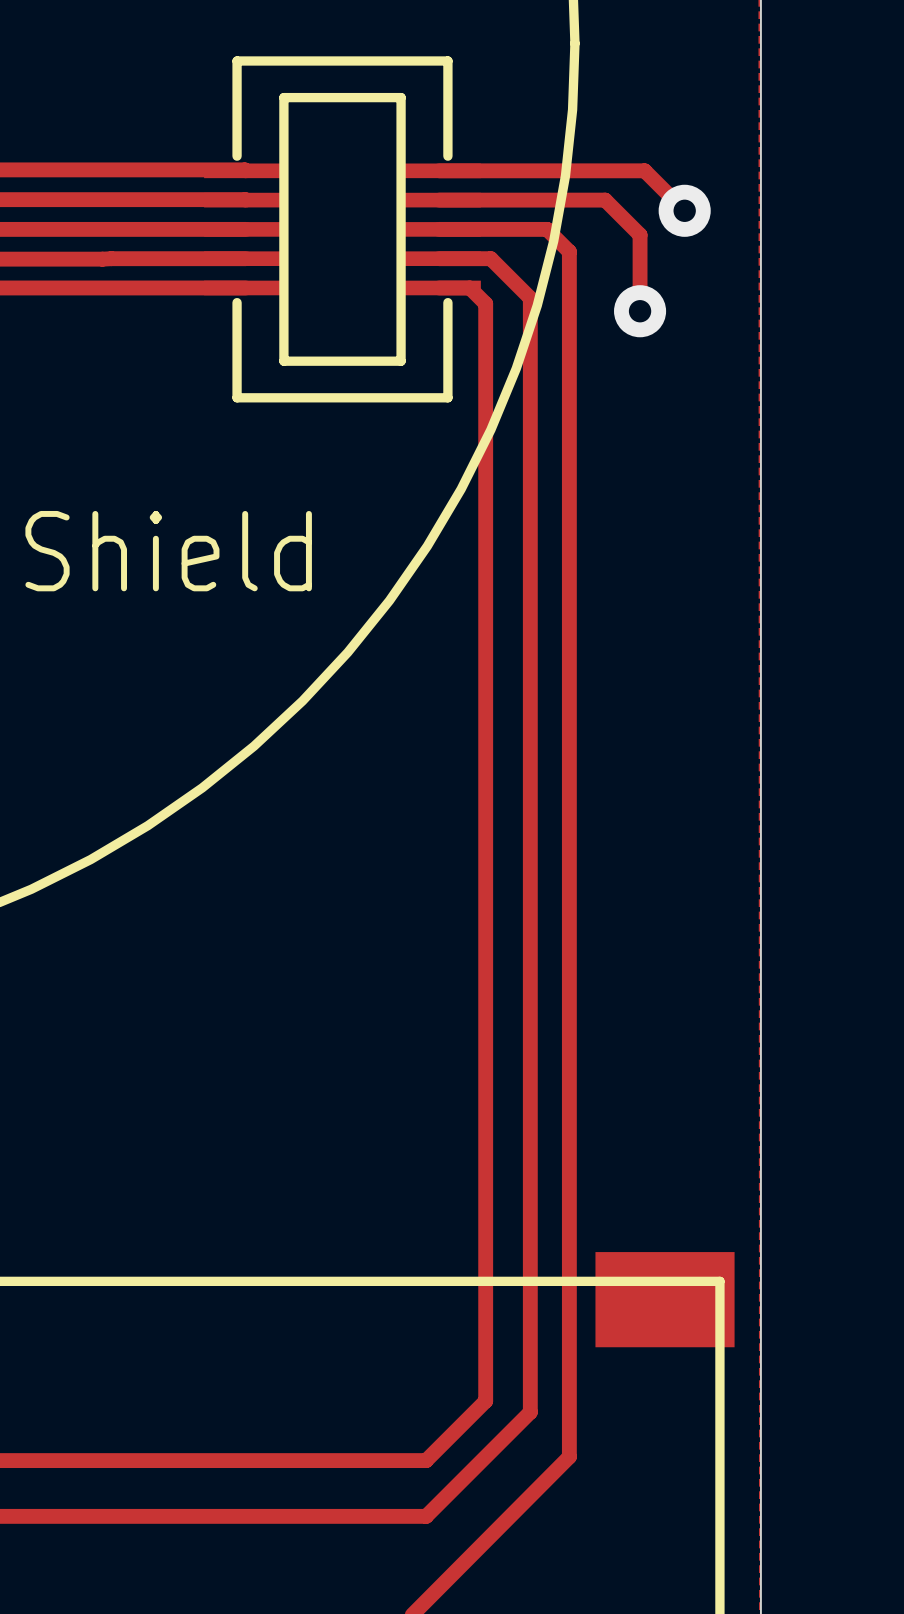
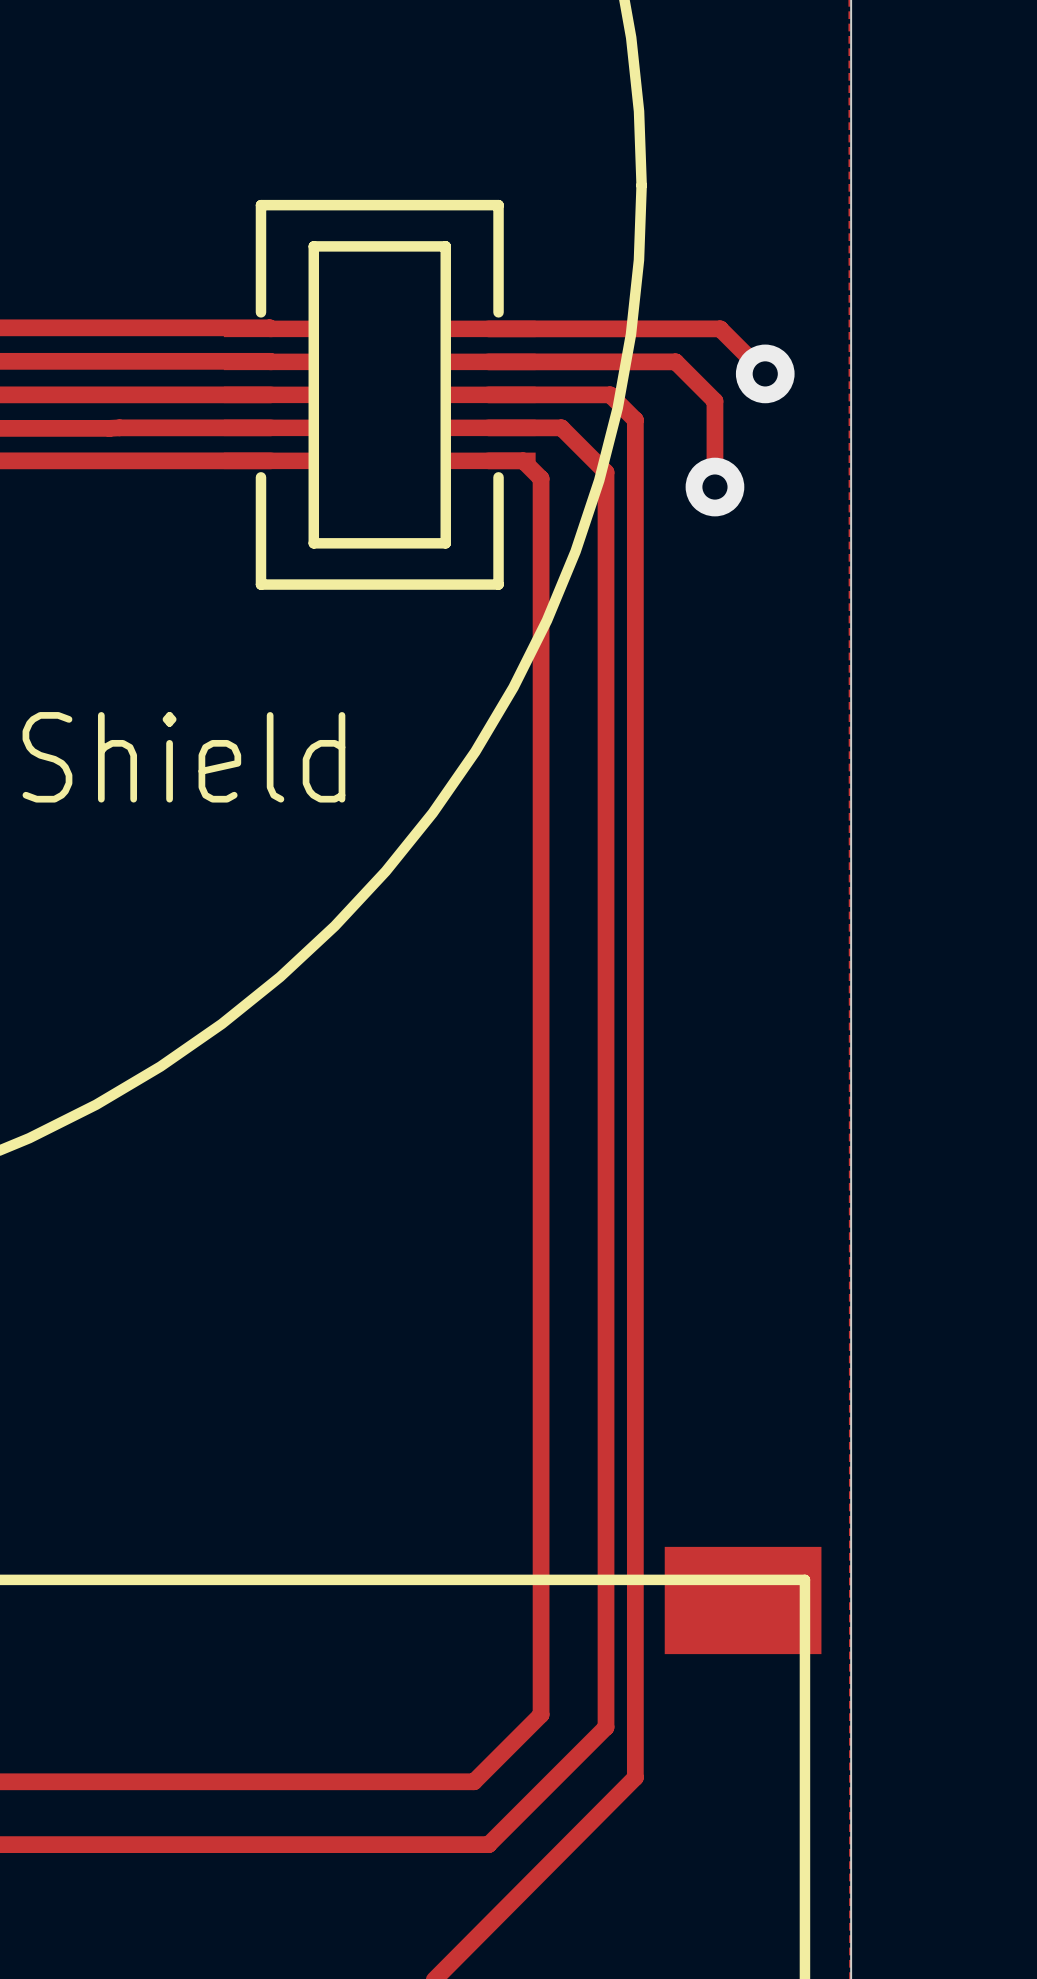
track: (490, 258) (530, 298) (530, 1412) (426, 1516) -> (546, 427) (561, 427) (606, 472) (606, 1727) (488, 1844) (474, 1844)

